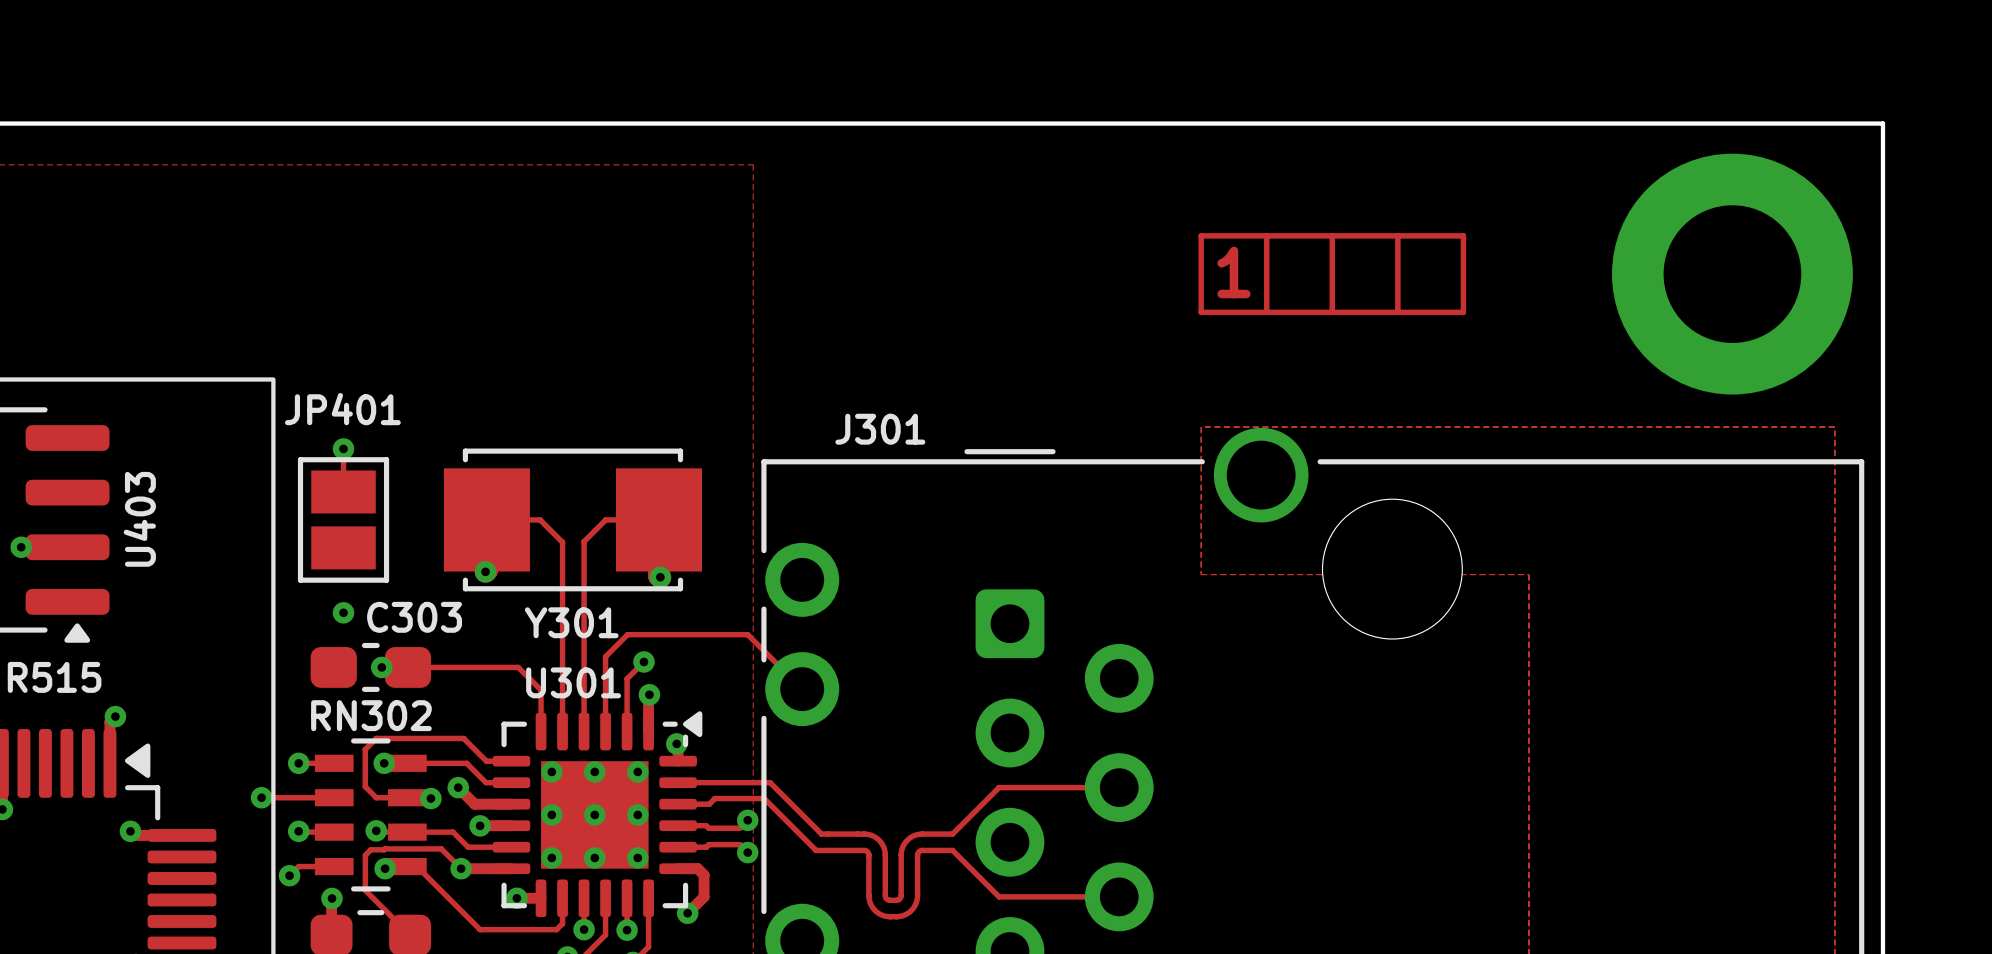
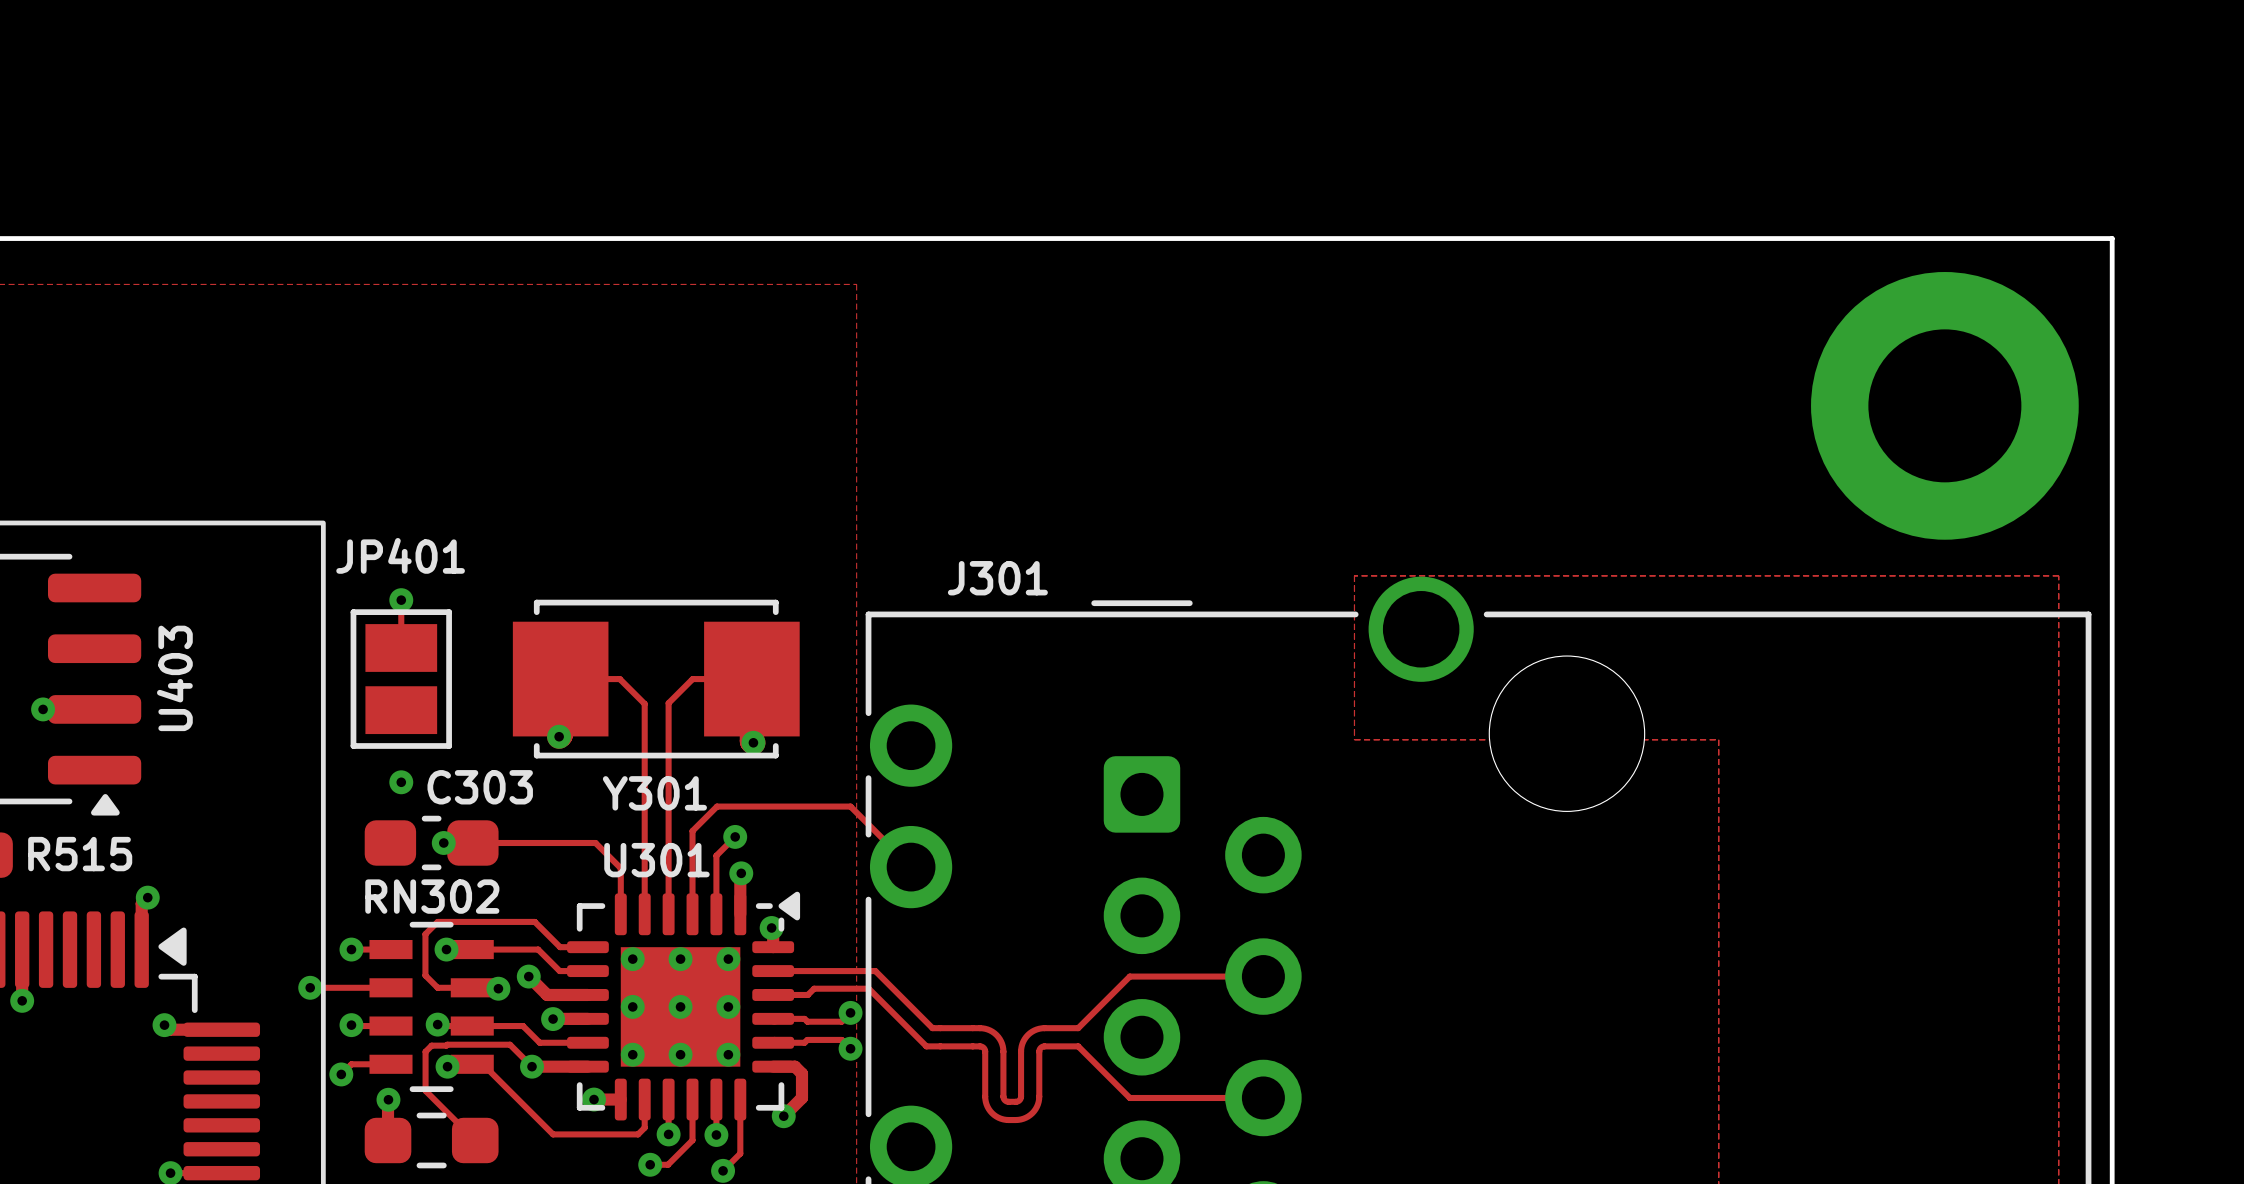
track: (1201, 235) (1201, 312) (1463, 312) (1463, 235) (1201, 235) -> none
track: (1266, 235) (1266, 312) -> none
track: (1332, 235) (1332, 312) -> none
track: (1397, 235) (1397, 312) -> none
text: 1 (1233, 272) -> none

